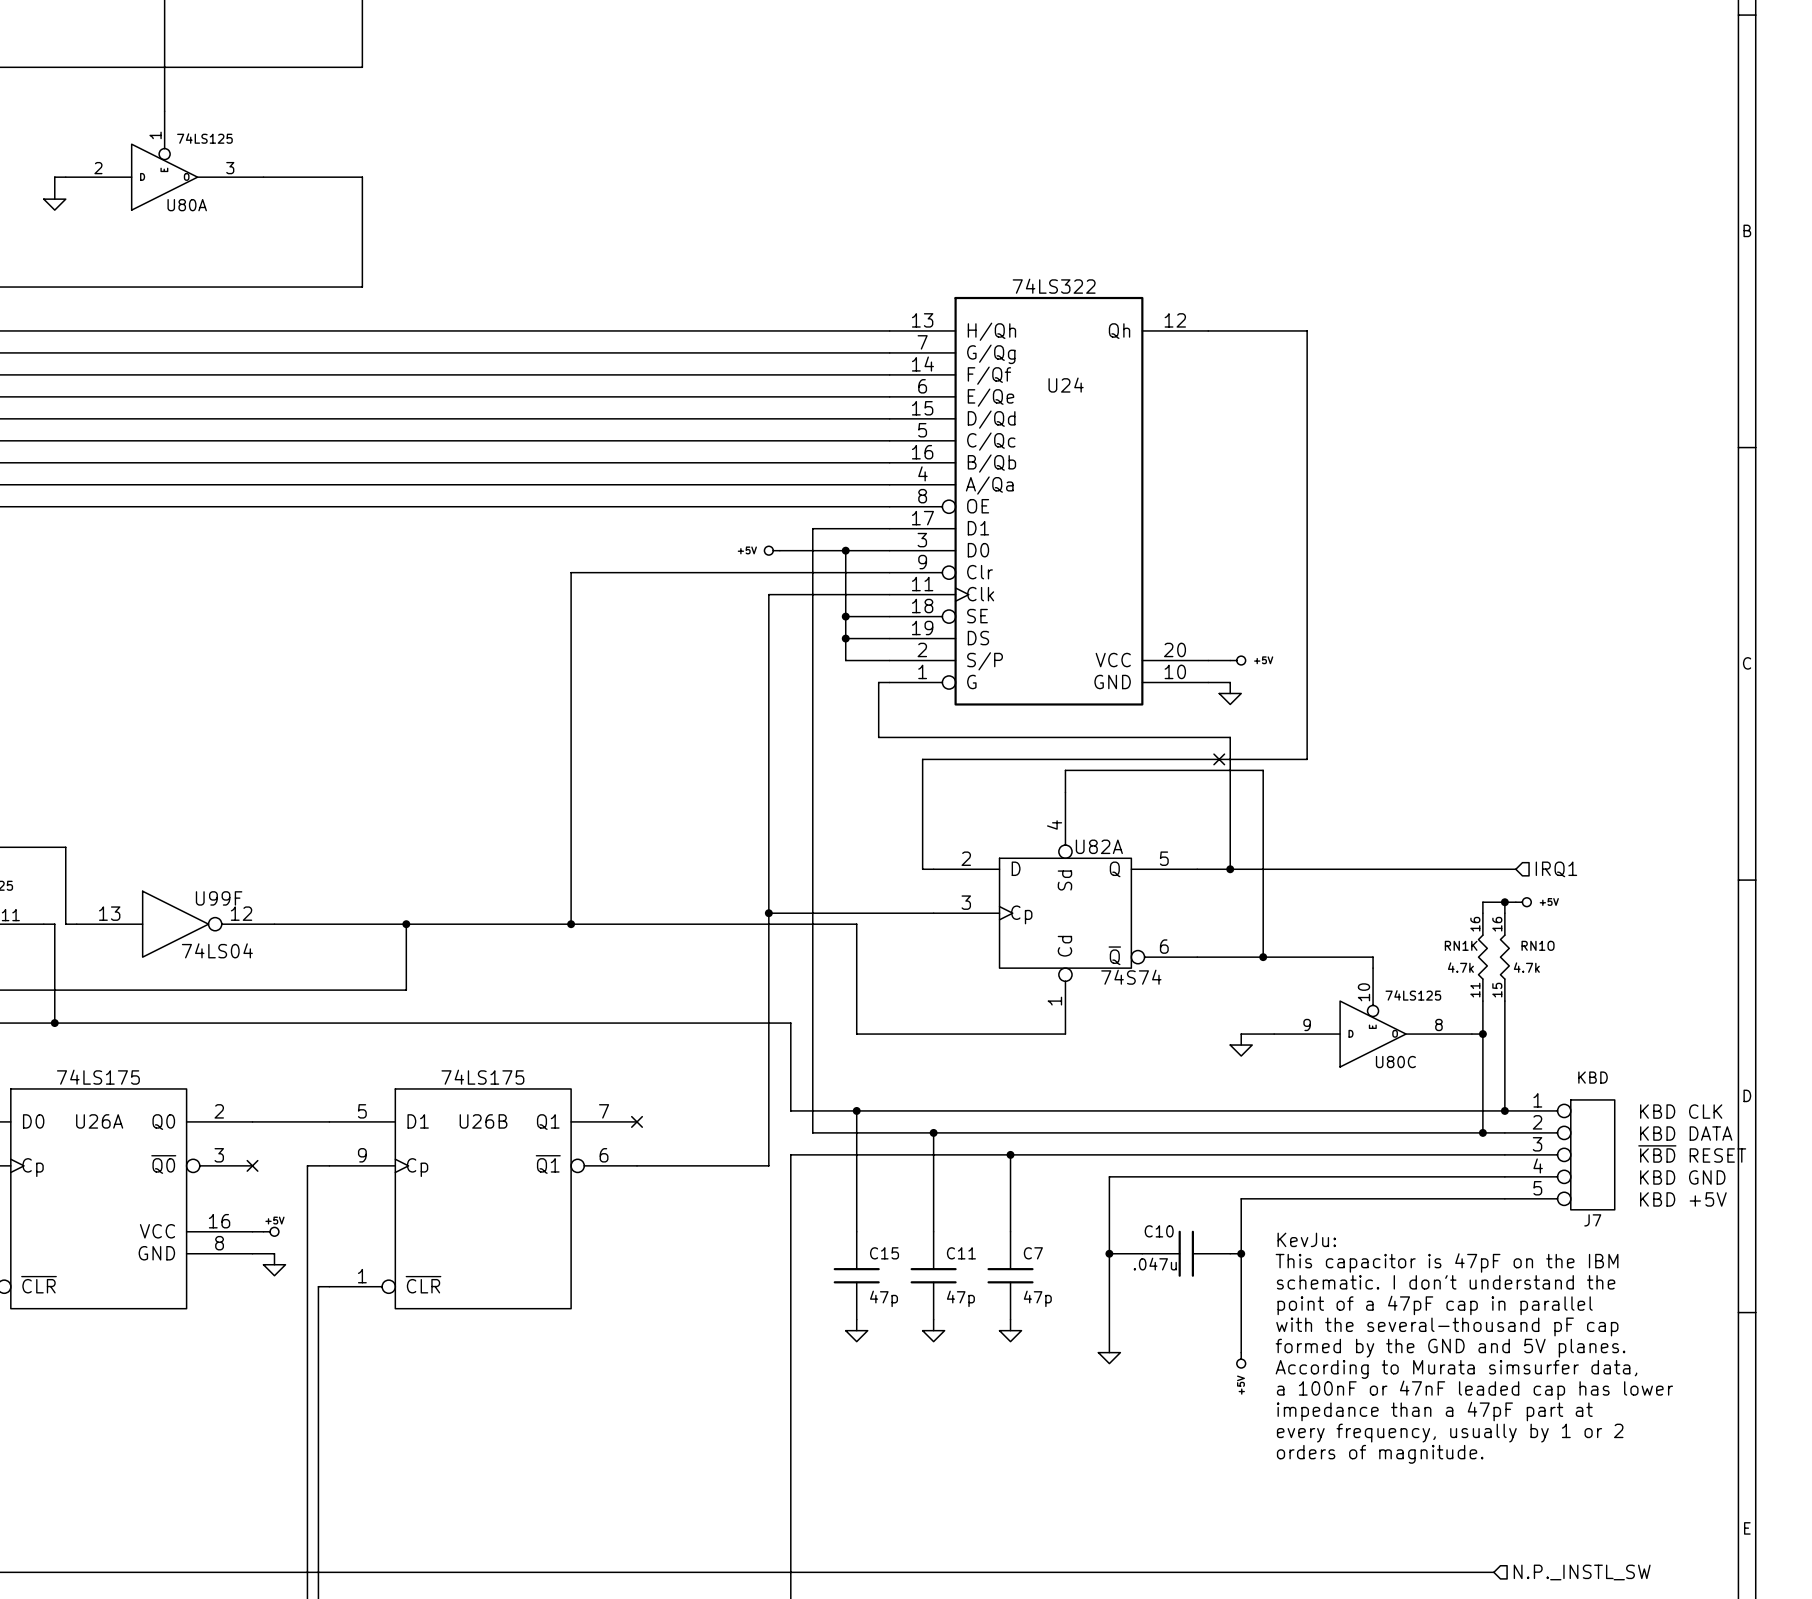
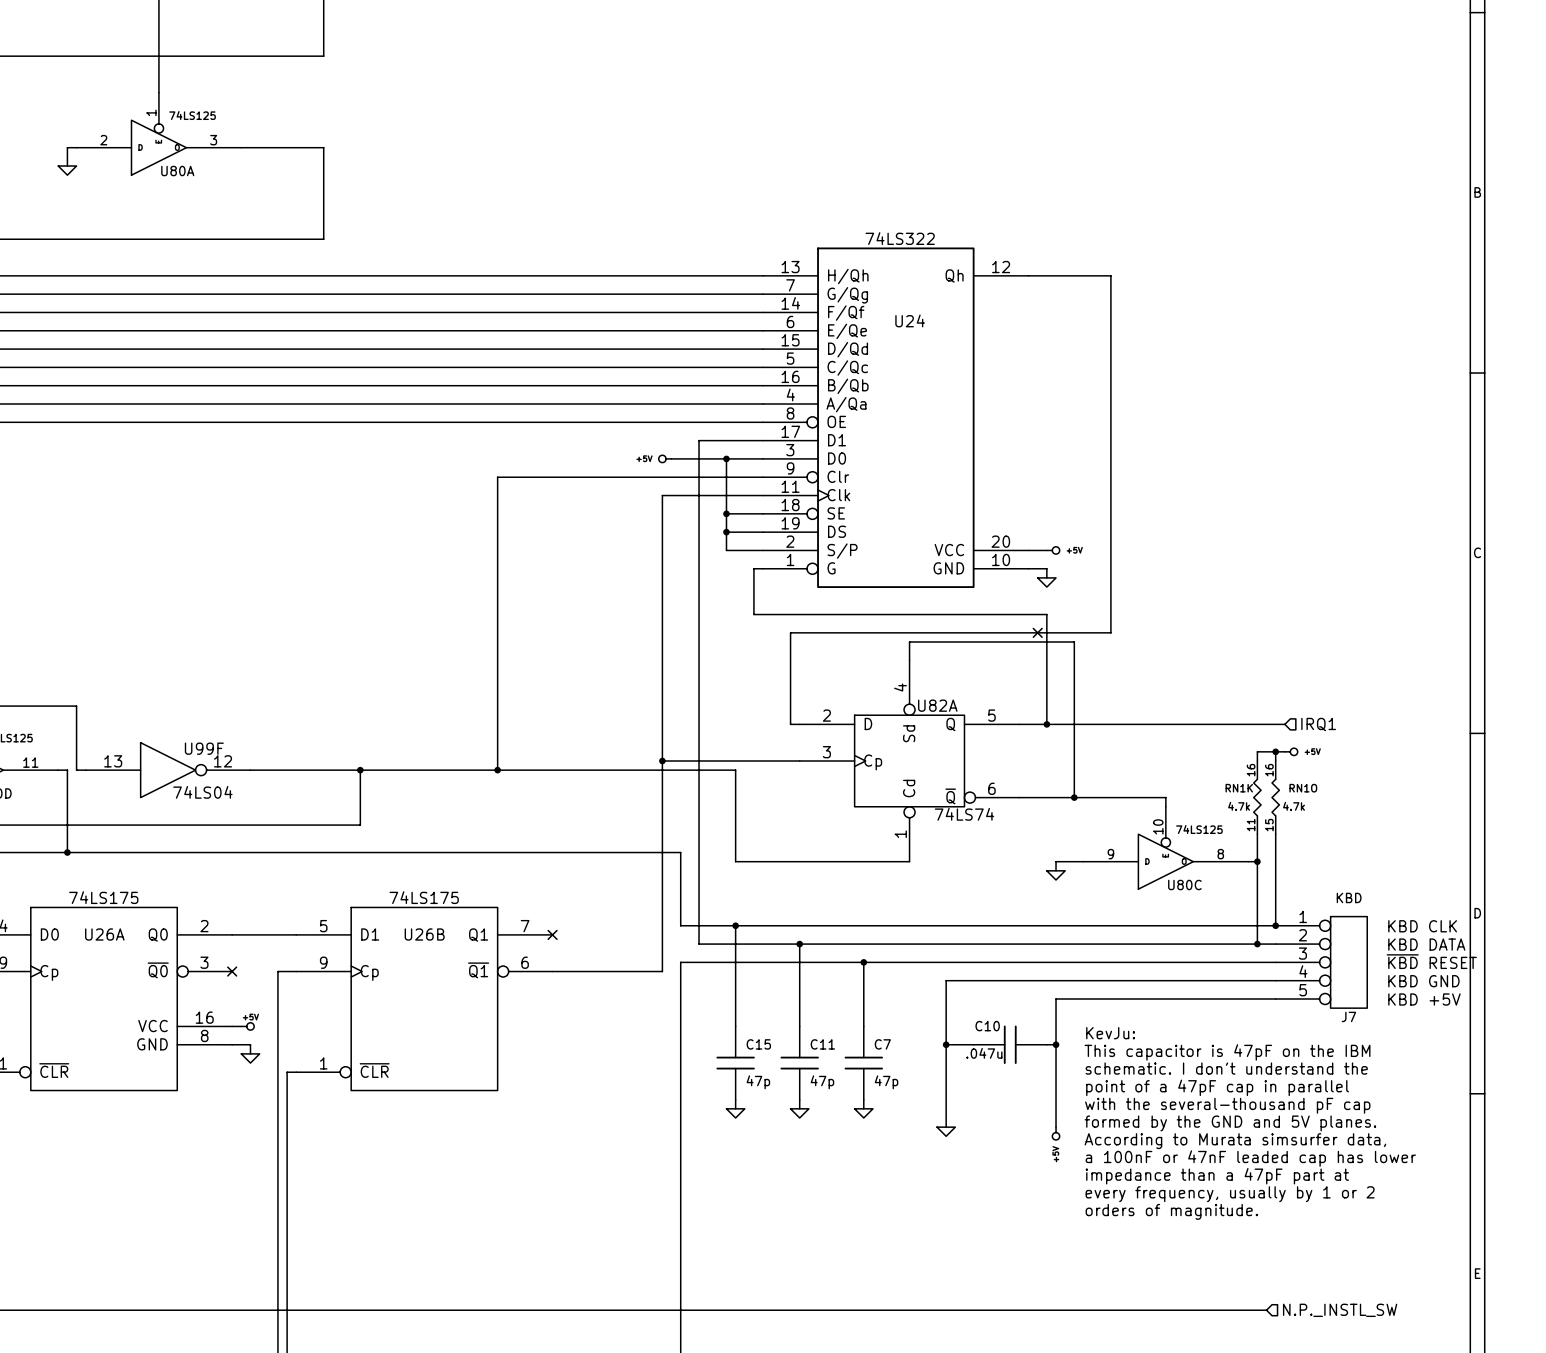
U82A value: 74S74 (1131, 977) -> 74LS74 (964, 814)

